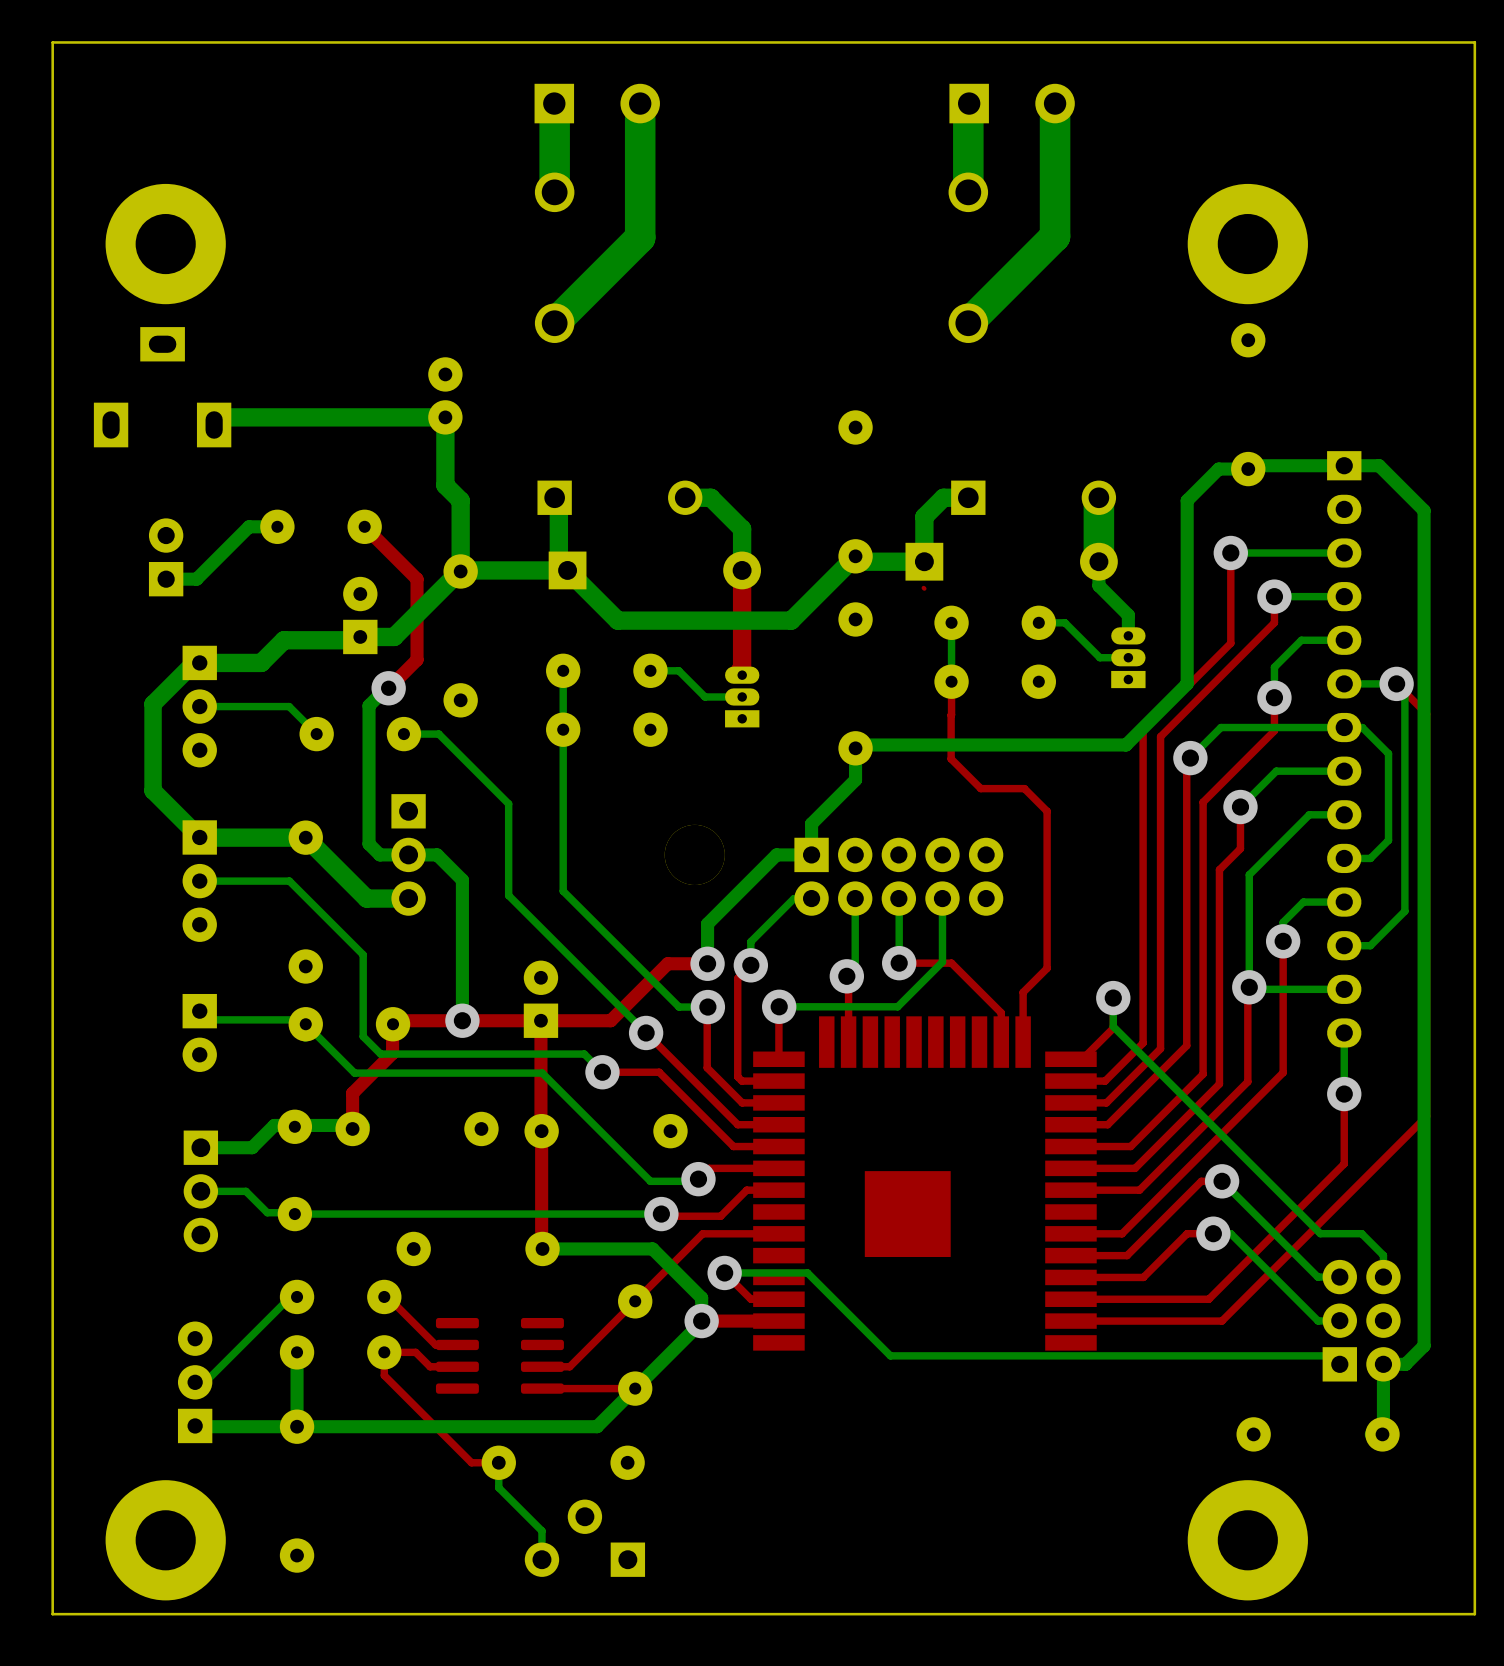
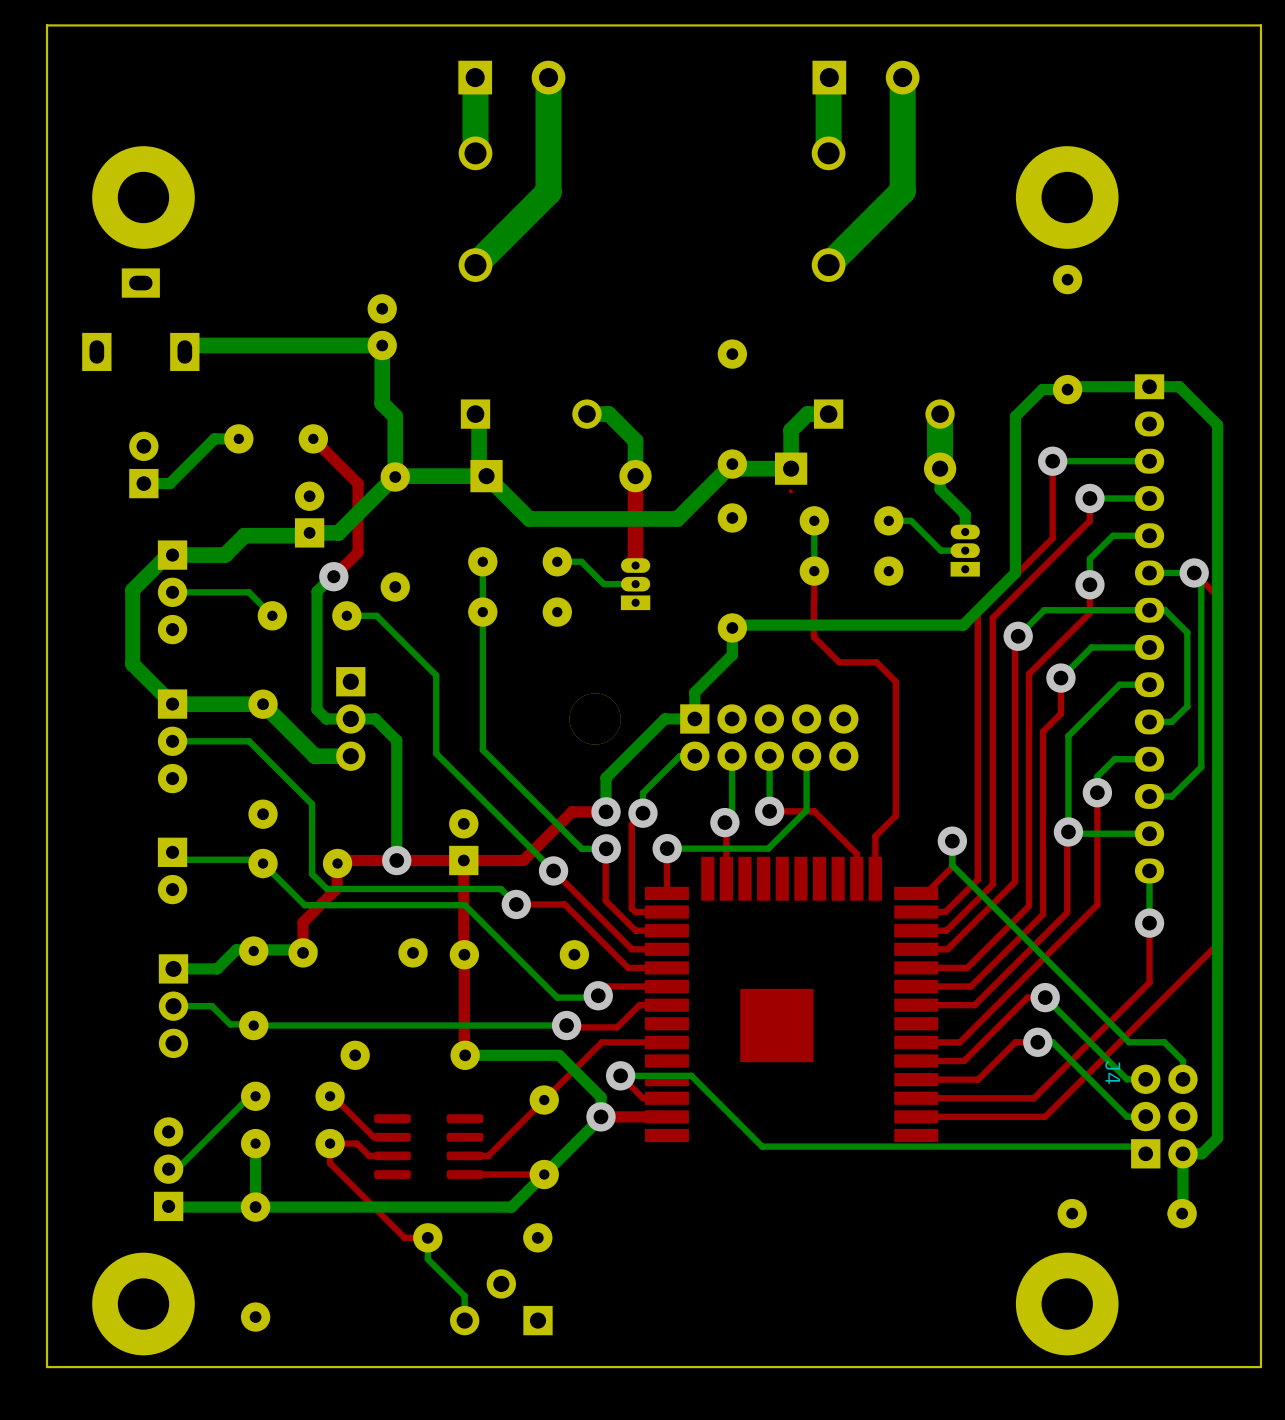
J4 name: none -> J4 (1112, 1072)

